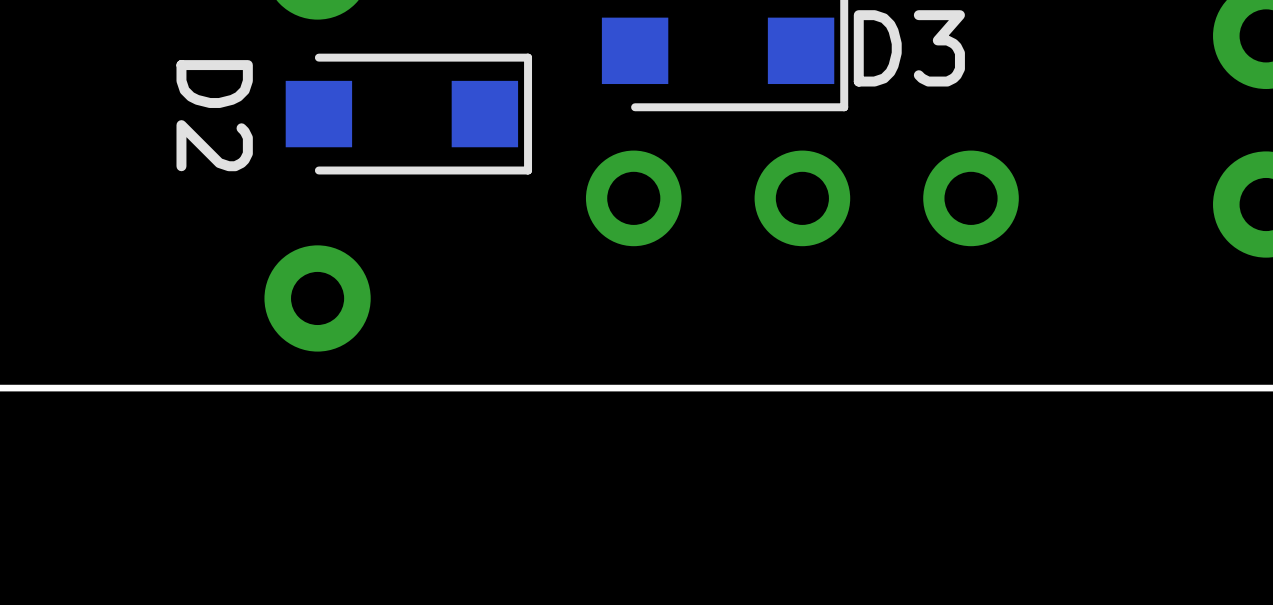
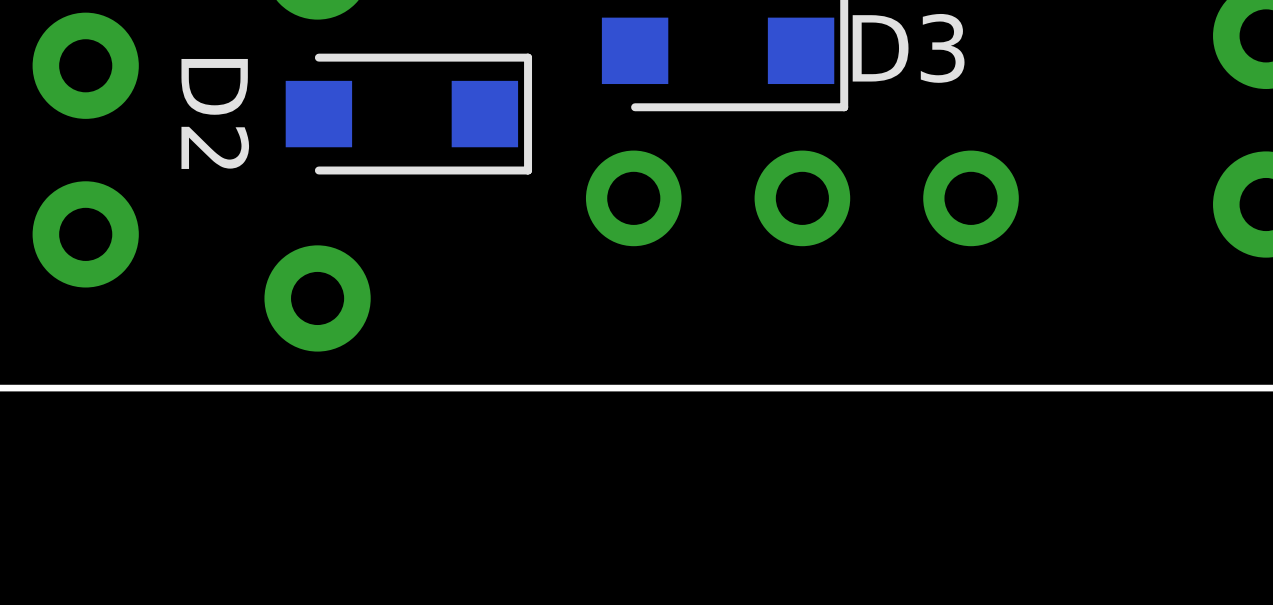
part: none -> (85, 150)

